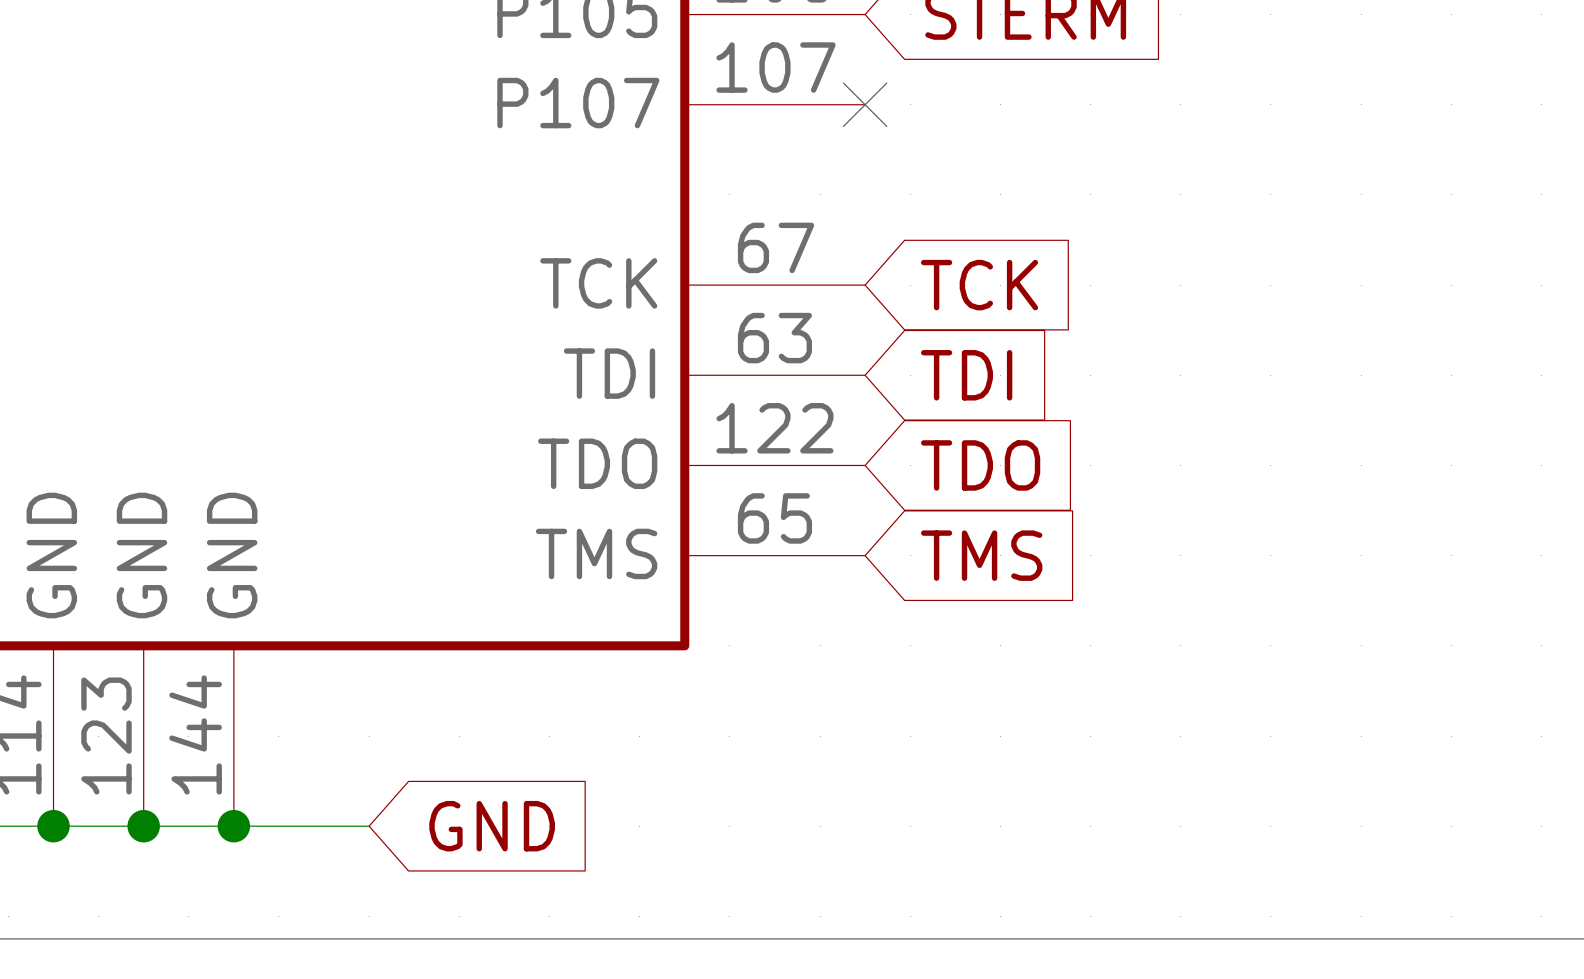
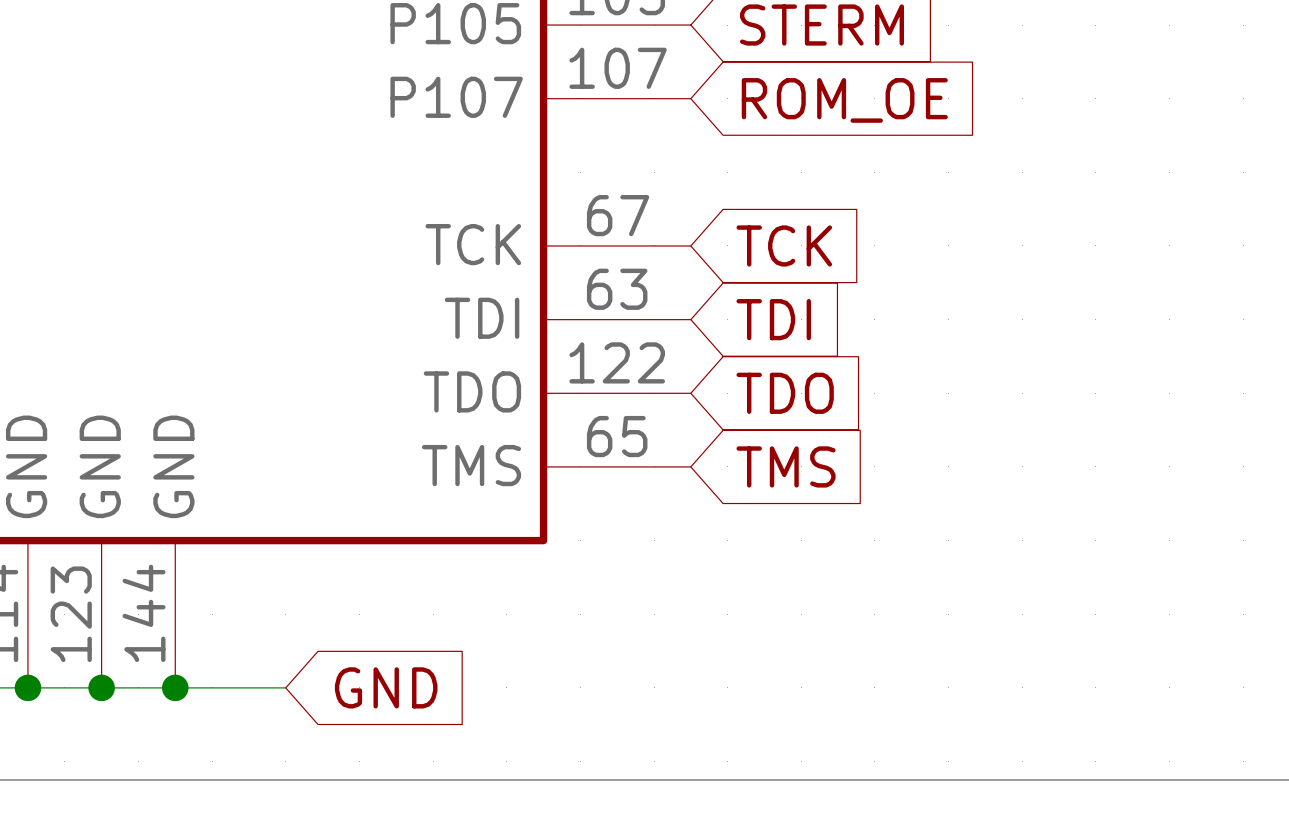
no-connect mark: (865, 104) -> none
global label: none -> ROM_OE (844, 100)

